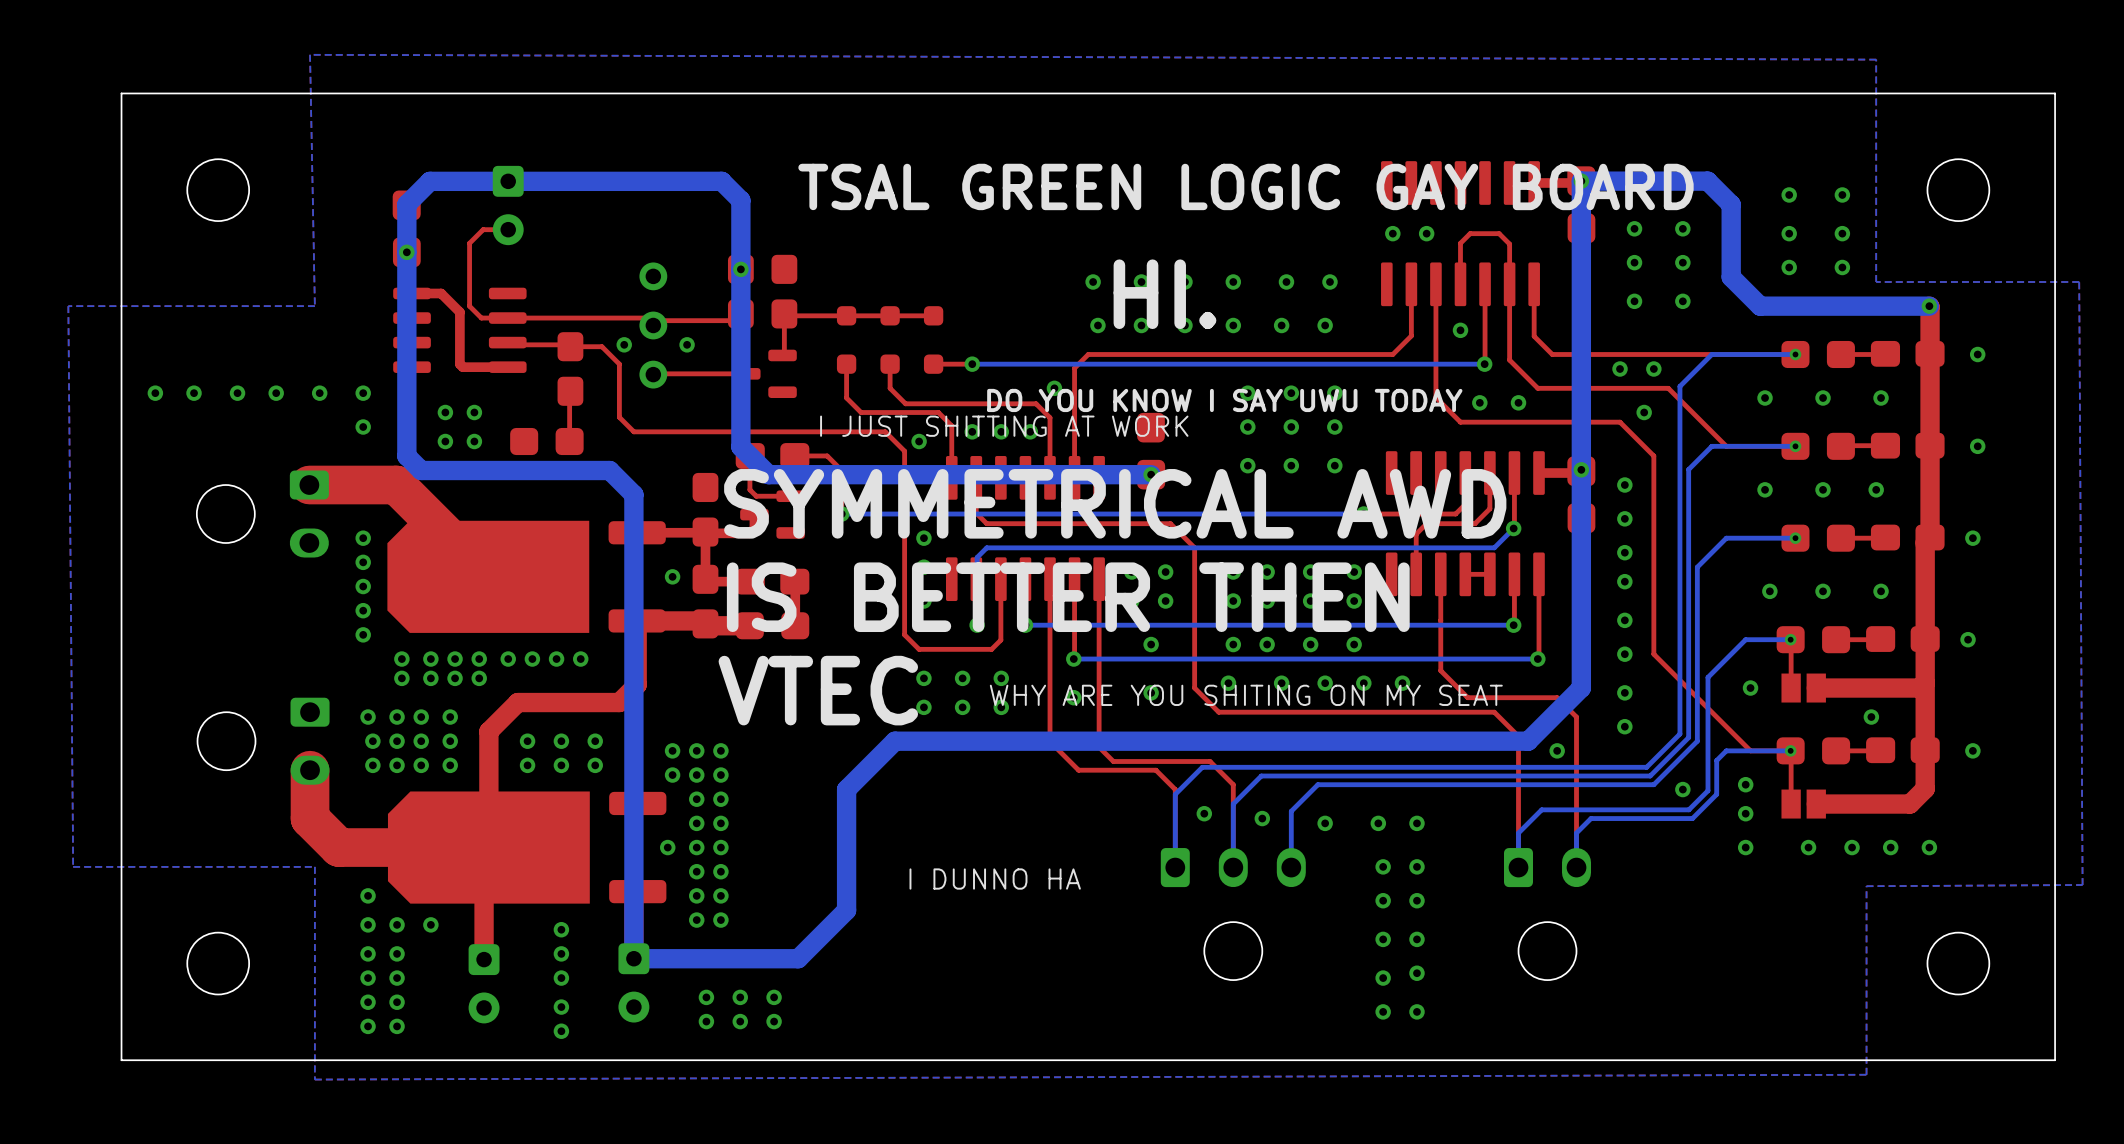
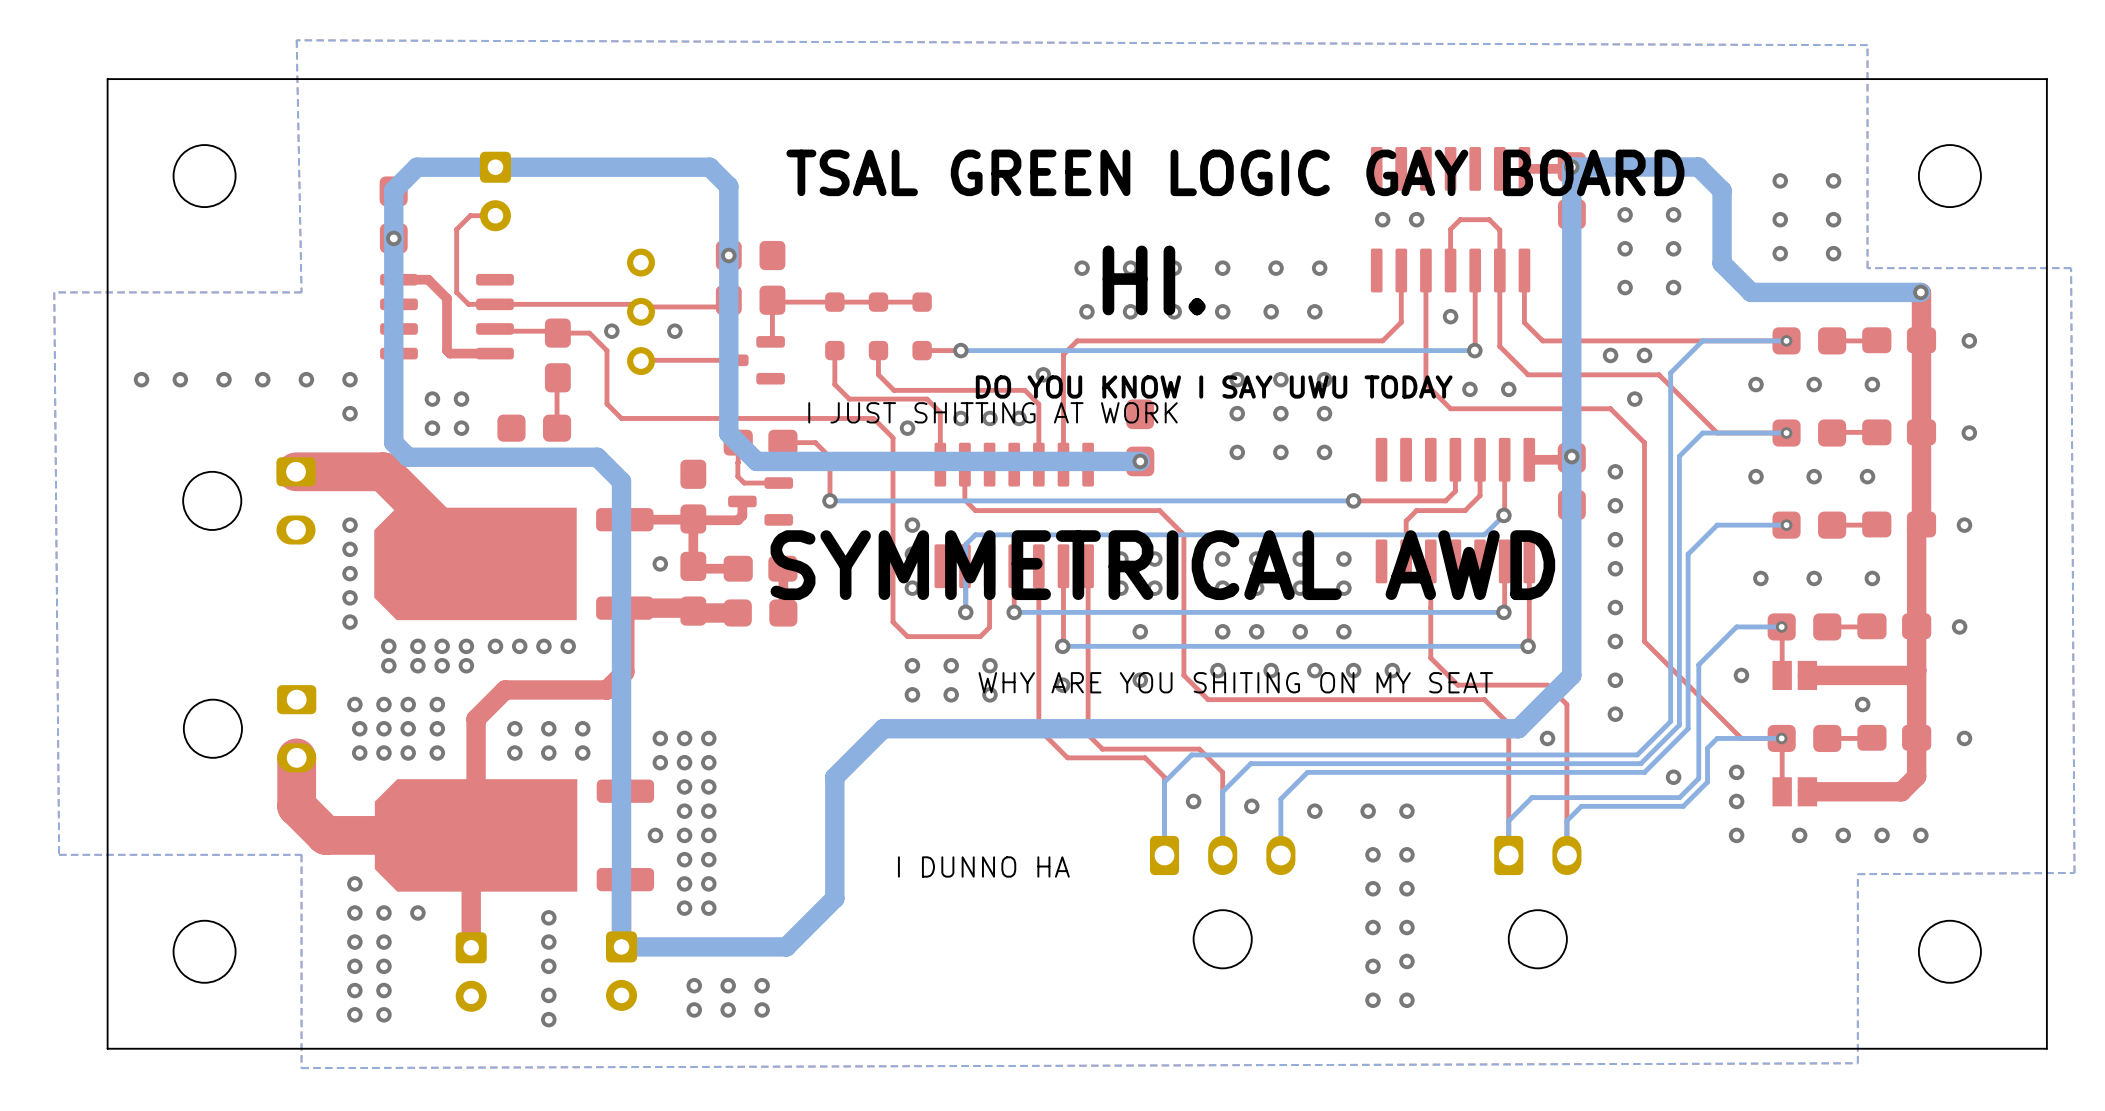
text position: SYMMETRICAL AWD (1115, 503) -> SYMMETRICAL AWD (1162, 565)
text: IS BETTER THEN (1068, 597) -> none
text: VTEC (818, 690) -> none

